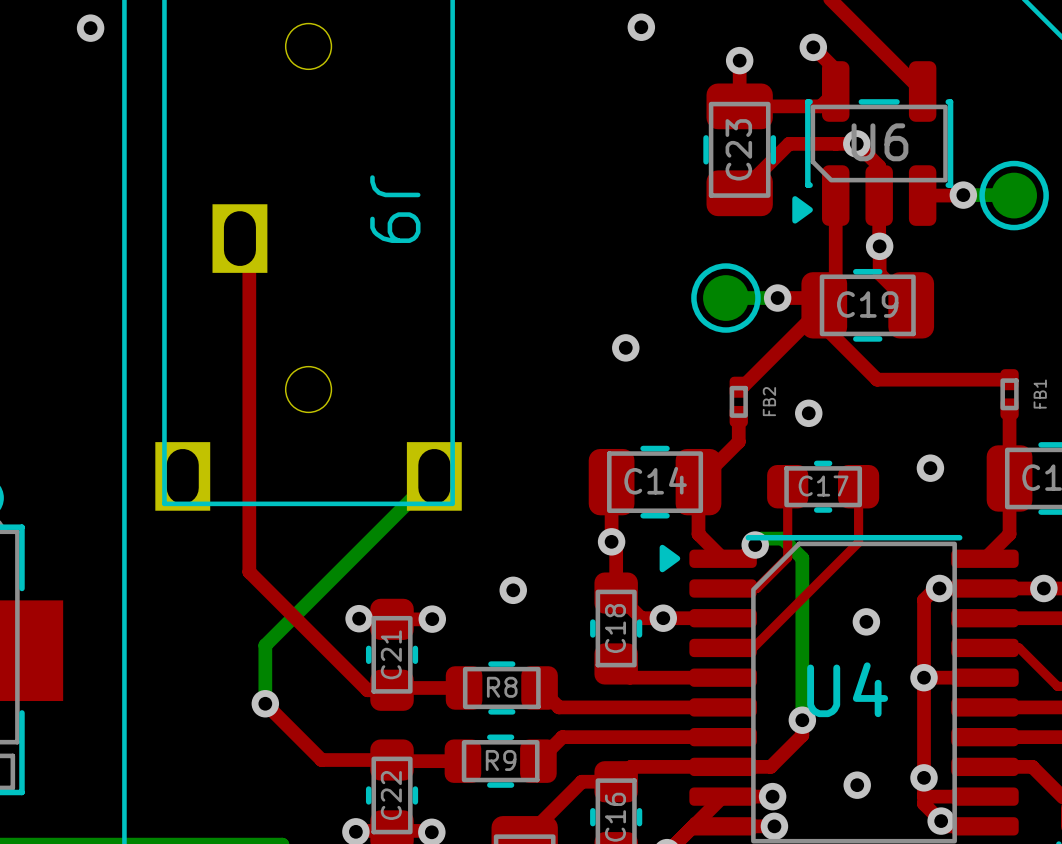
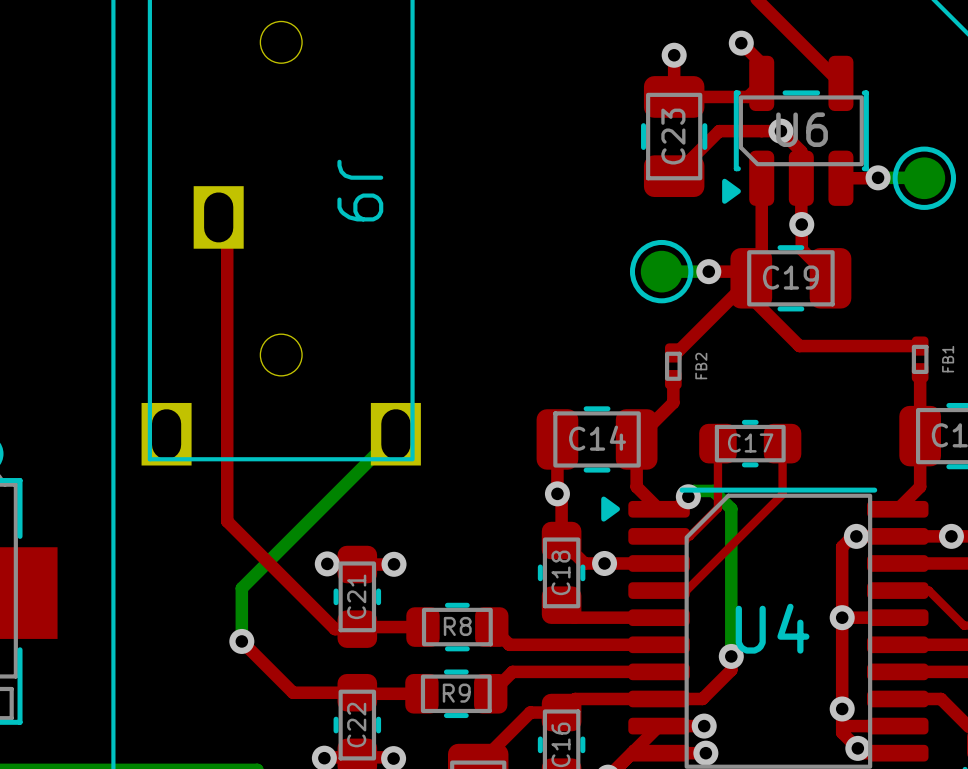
via: (641, 27) -> none
via: (90, 28) -> none
via: (625, 347) -> none
via: (808, 413) -> none
via: (930, 468) -> none
via: (513, 590) -> none
via: (866, 621) -> none
via: (857, 785) -> none

